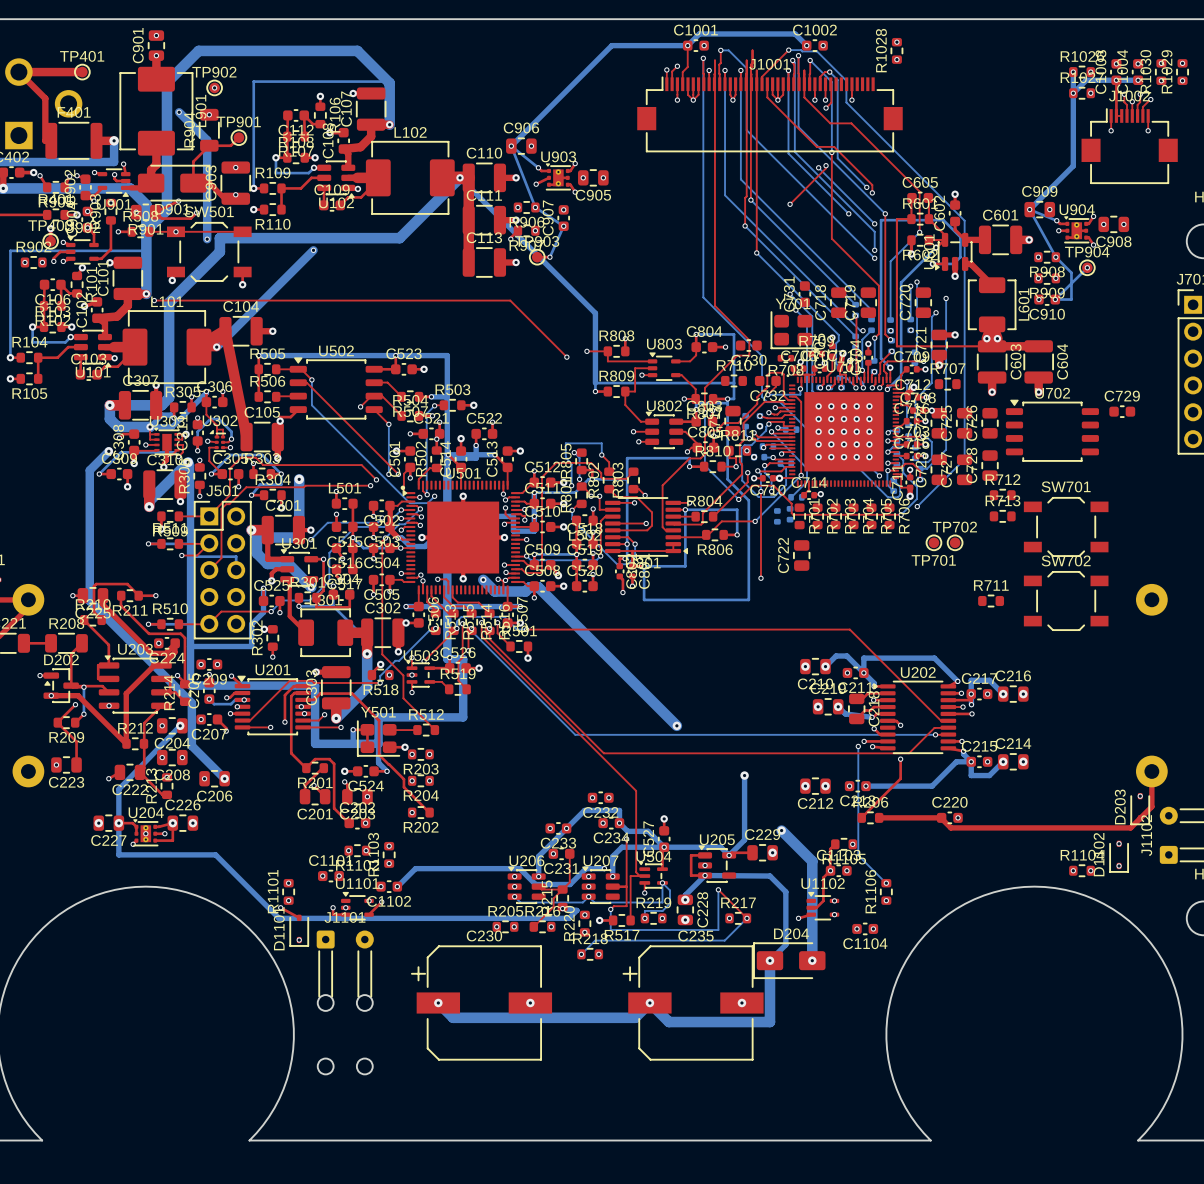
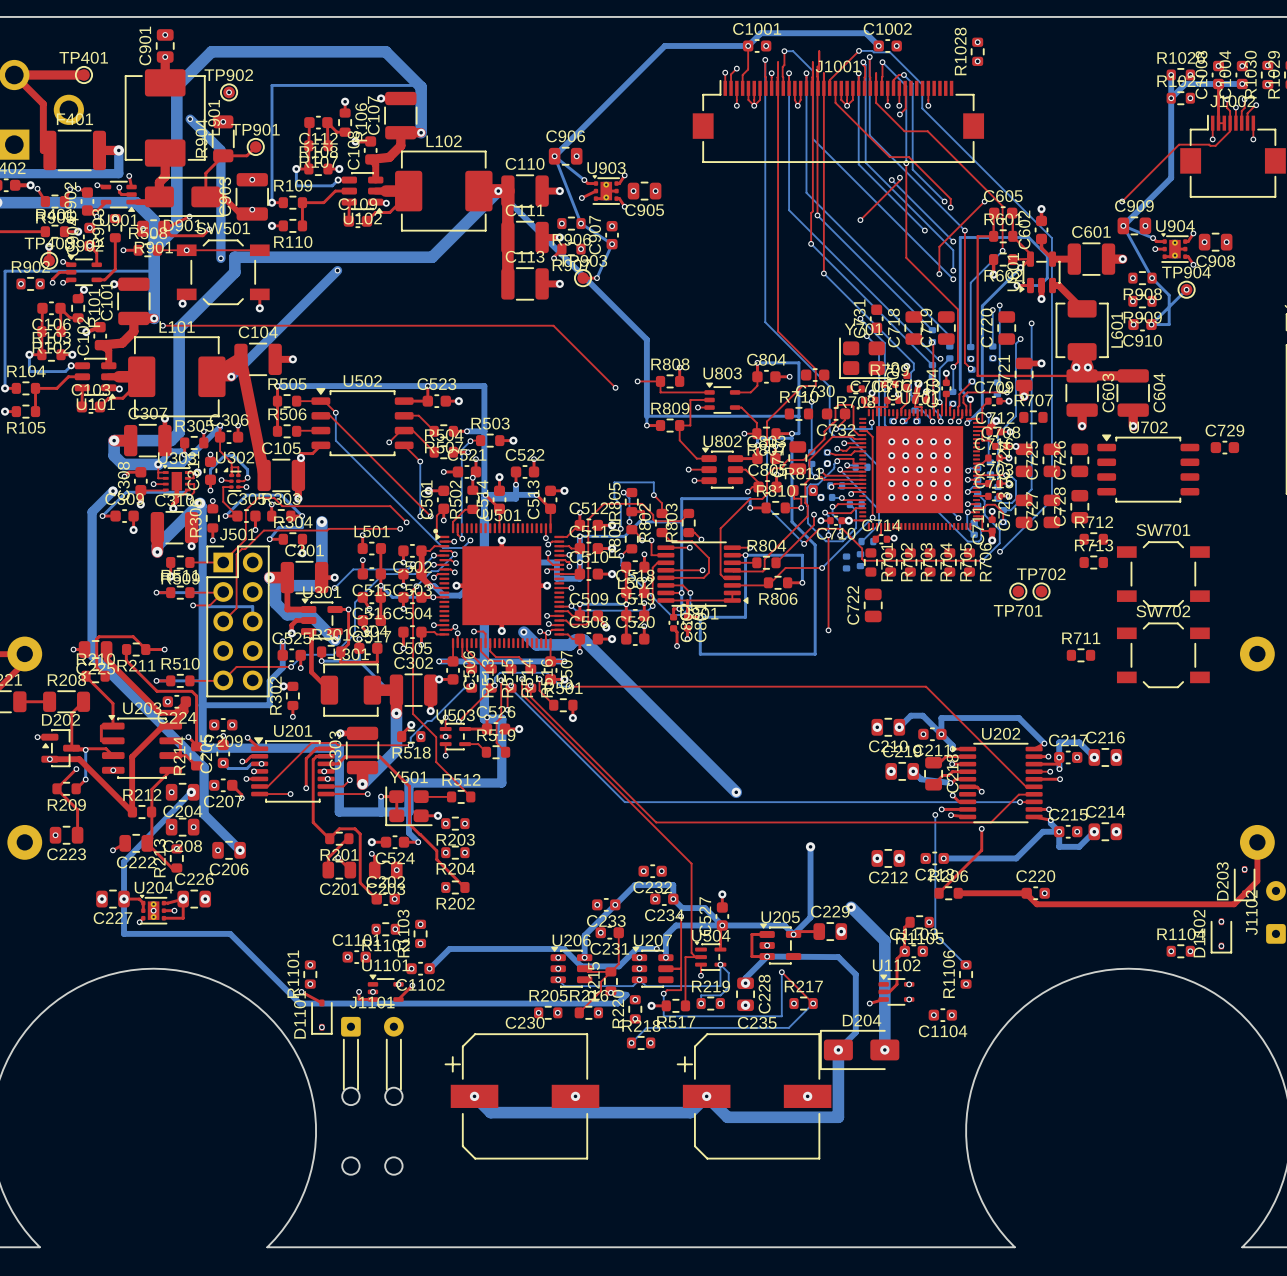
top track: none -> (1230, 123) (1230, 131) (1215, 145) (1179, 144) (1122, 201)
top track: none -> (984, 201) (939, 246) (939, 274)
via: none -> (984, 201)
via: none -> (1122, 201)
via: none -> (939, 274)
bottom track: none -> (811, 401) (811, 452)
via: none -> (811, 401)

